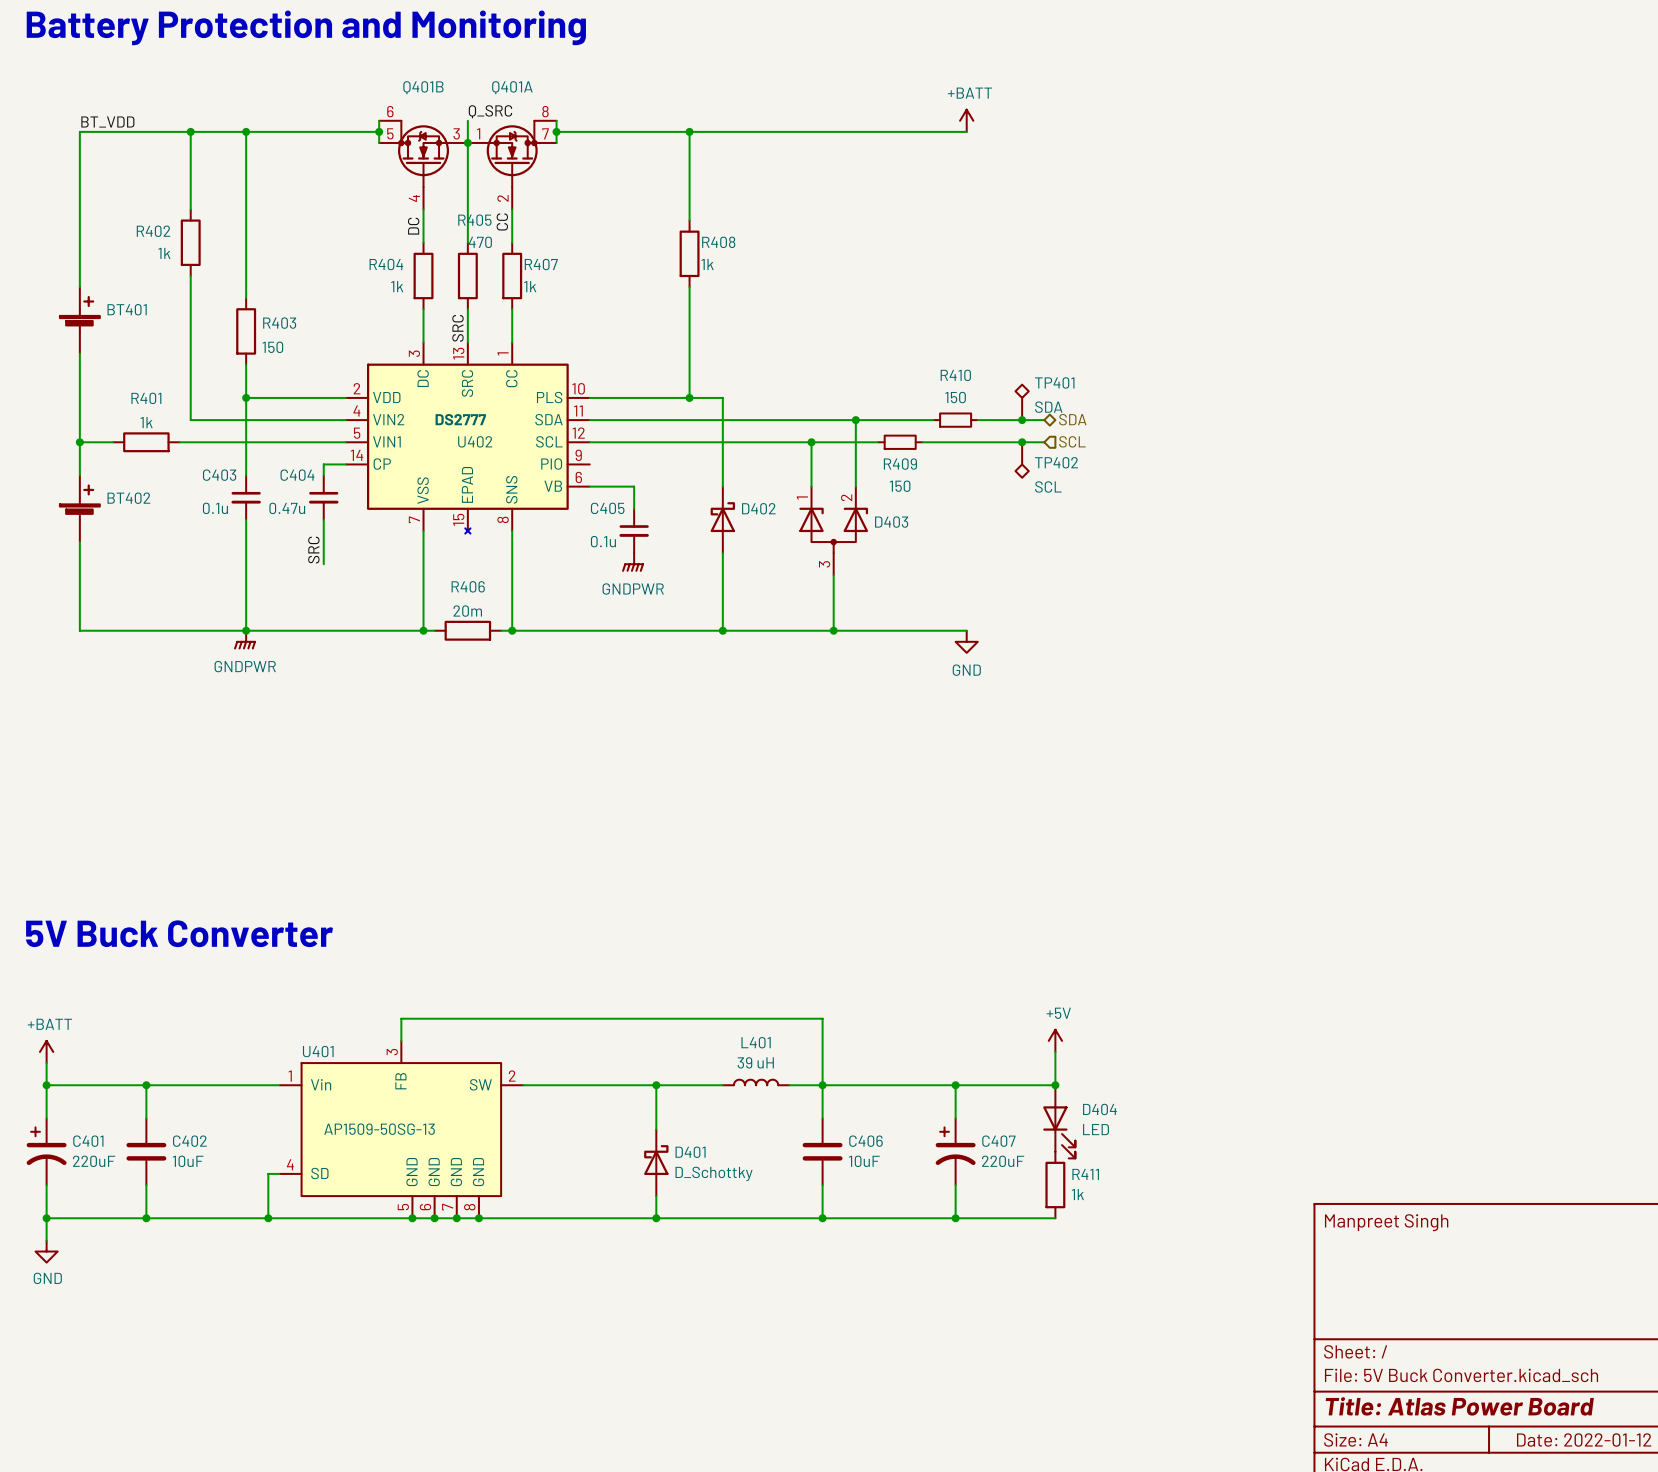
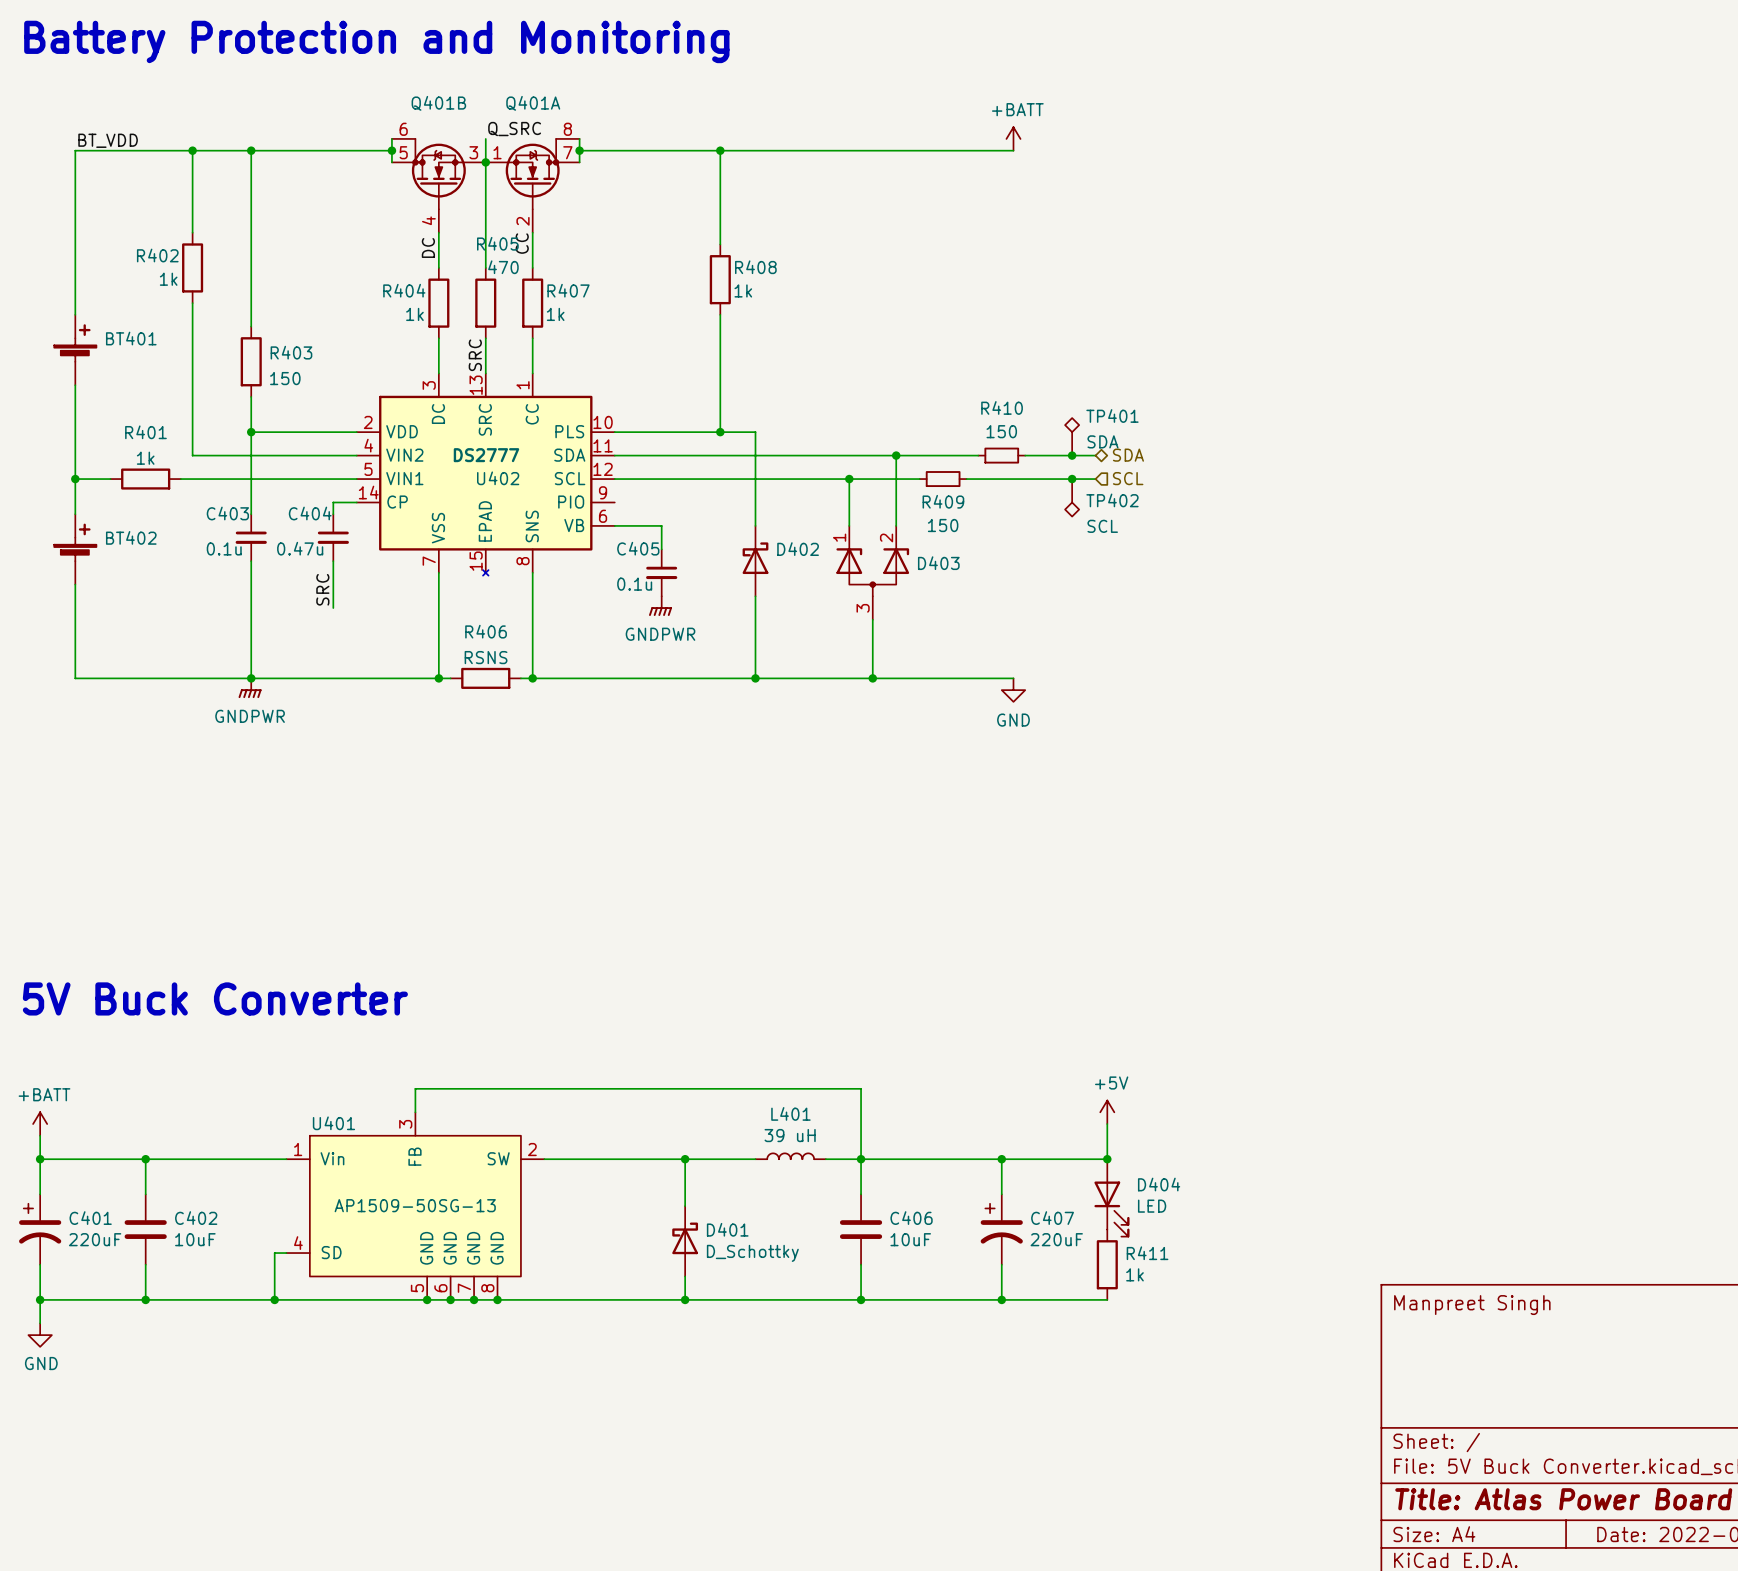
R406 value: 20m (467, 611) -> RSNS (486, 657)

